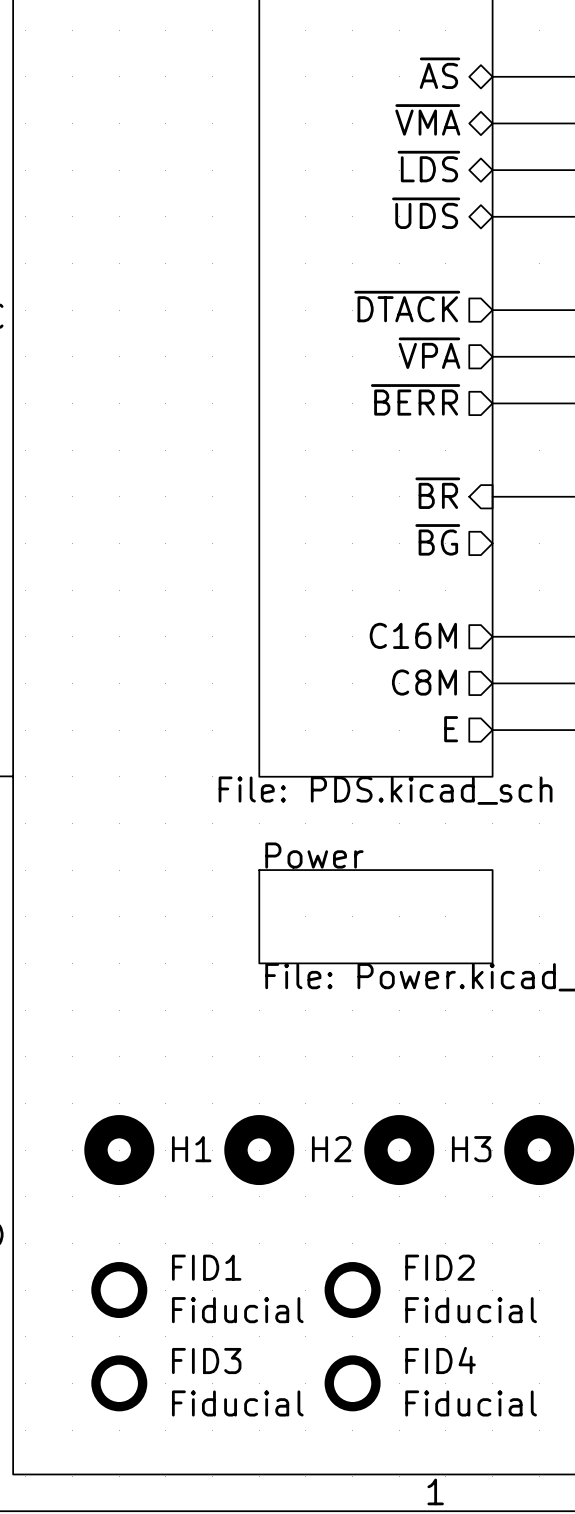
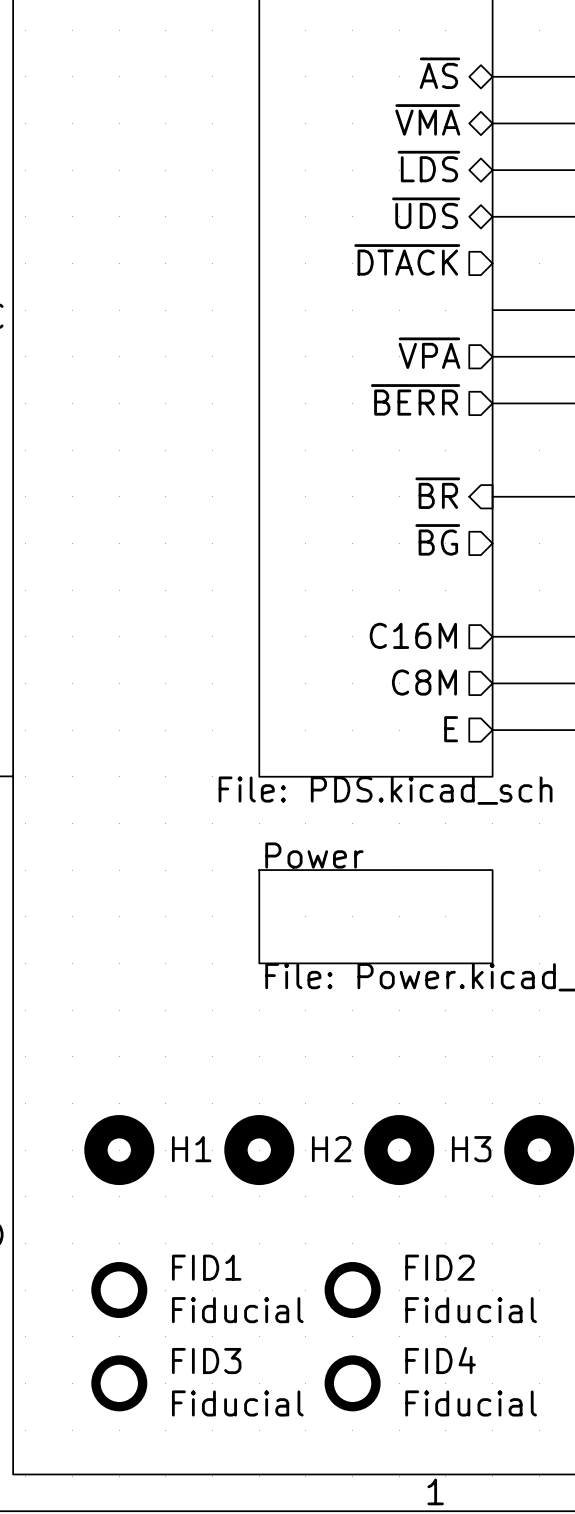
sheet pin position: ~{DTACK} (407, 306) -> ~{DTACK} (407, 259)

